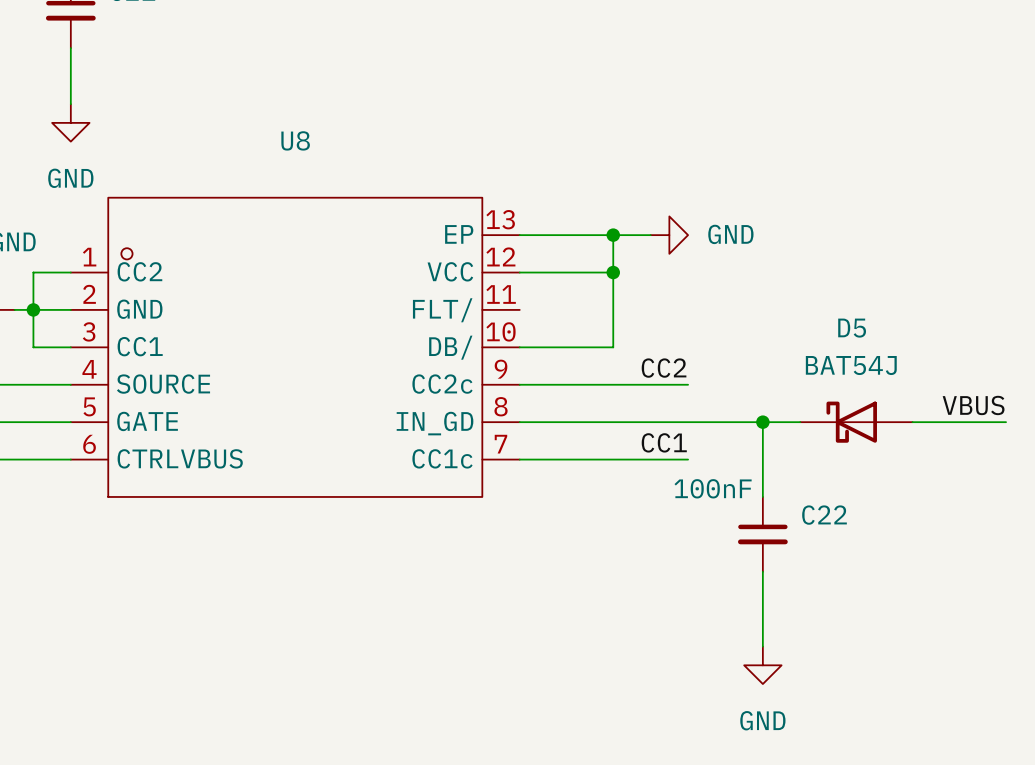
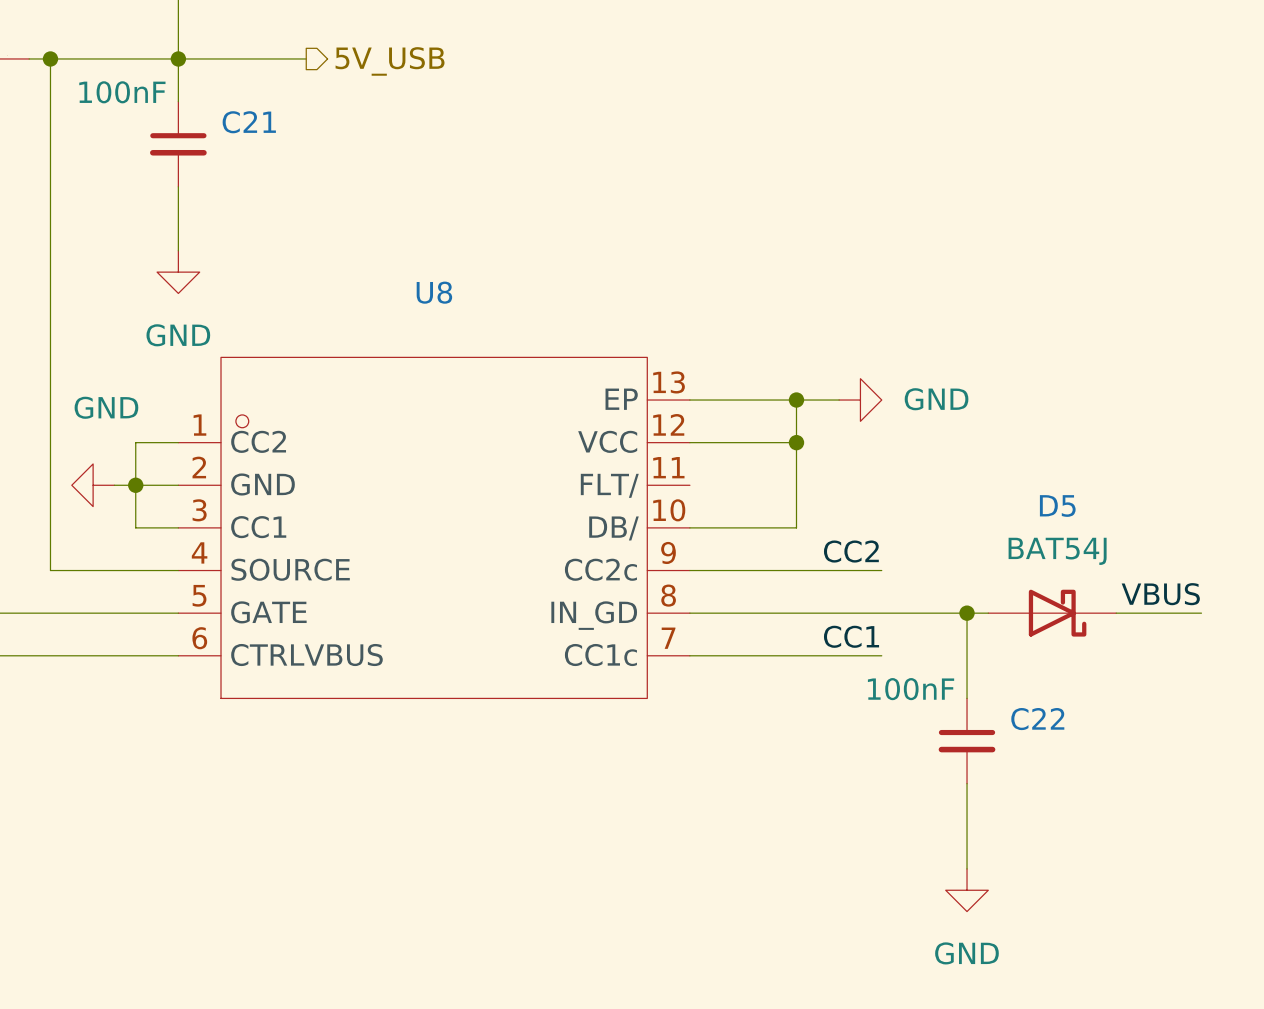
label position: VBUS (973, 405) -> VBUS (1160, 594)
D5 rotation: 0° (851, 422) -> 180° (1057, 613)
wire: (968, 422) (1006, 422) -> none

